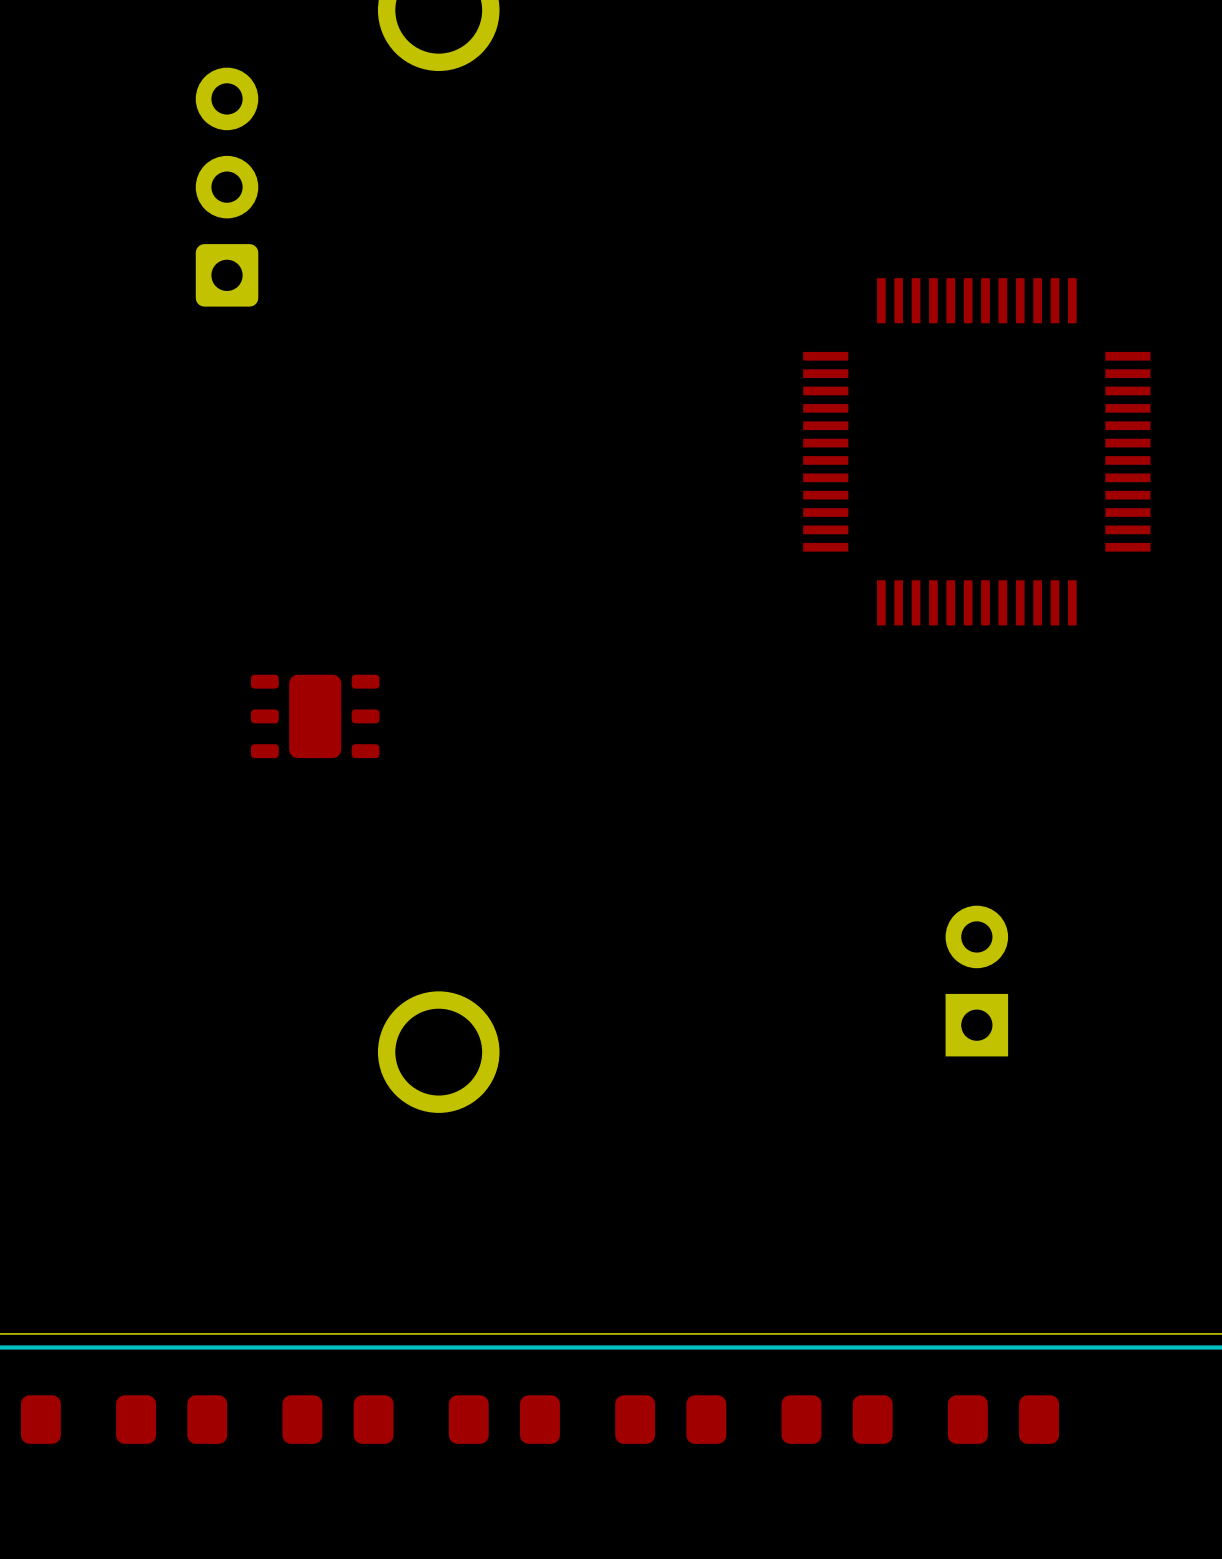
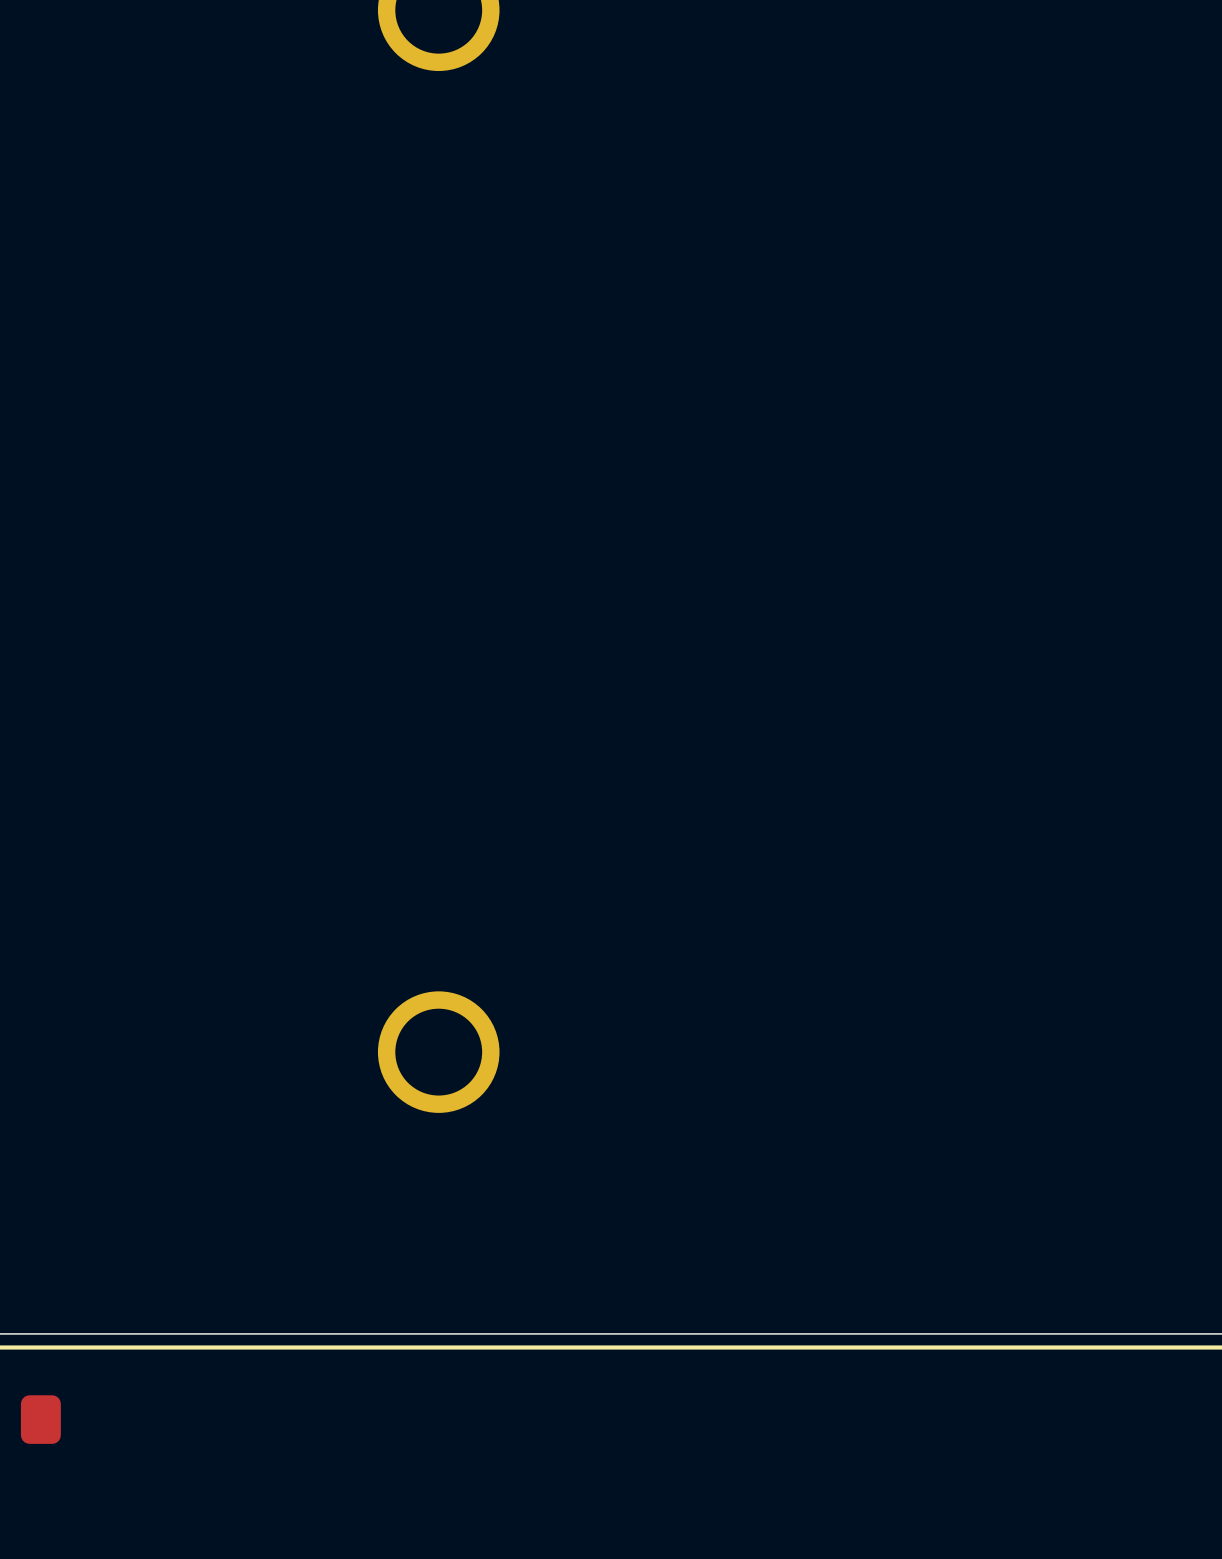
part: (227, 187) -> none
part: (976, 451) -> none
part: (315, 716) -> none
part: (976, 981) -> none
part: (171, 1419) -> none
part: (338, 1419) -> none
part: (504, 1419) -> none
part: (670, 1419) -> none
part: (837, 1419) -> none
part: (1003, 1419) -> none

